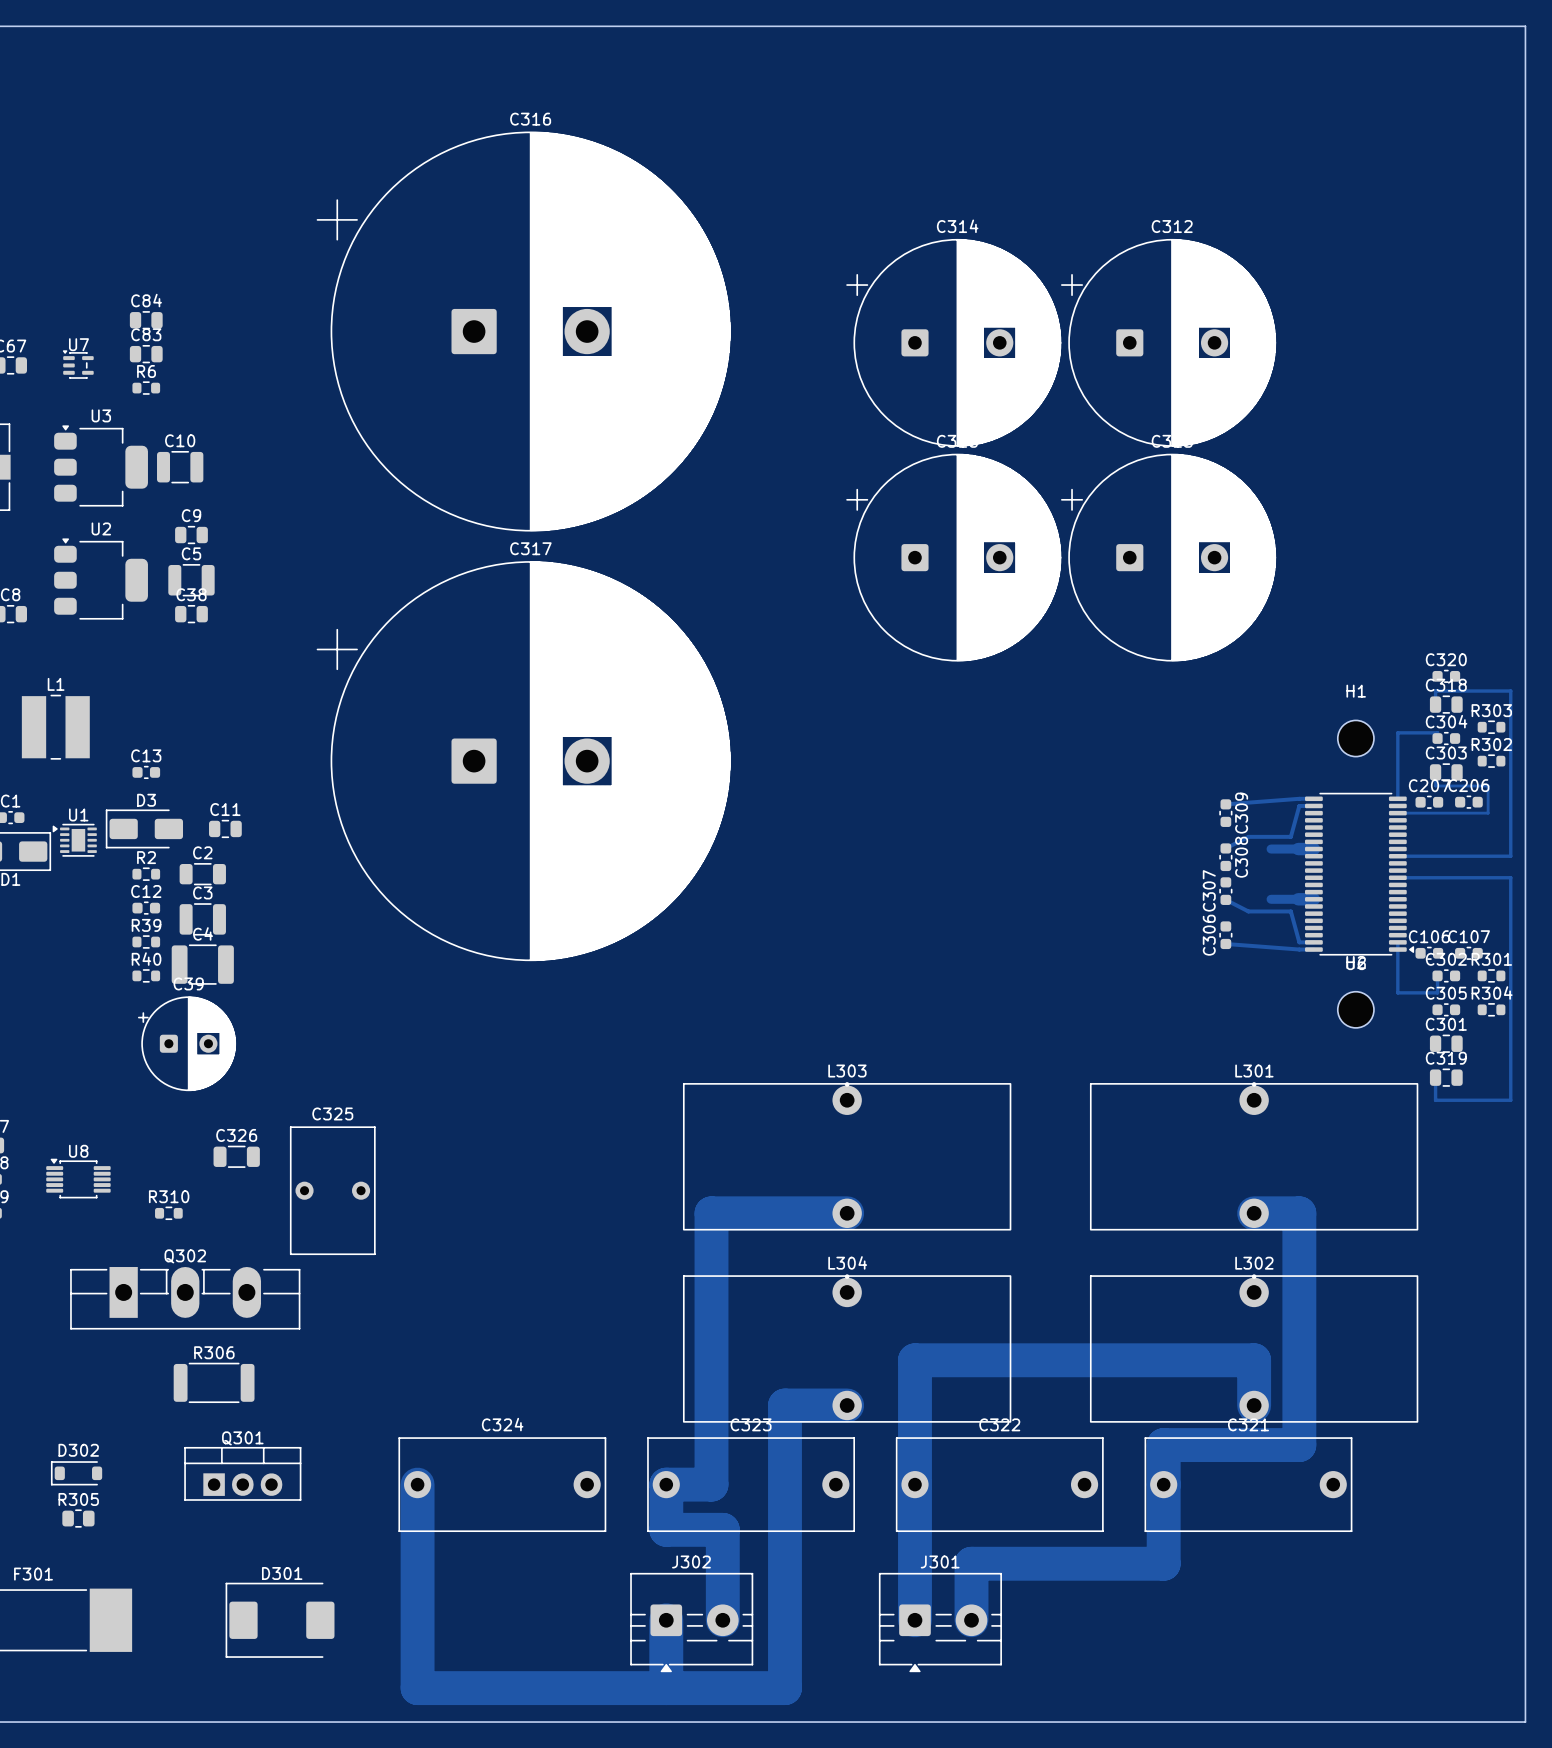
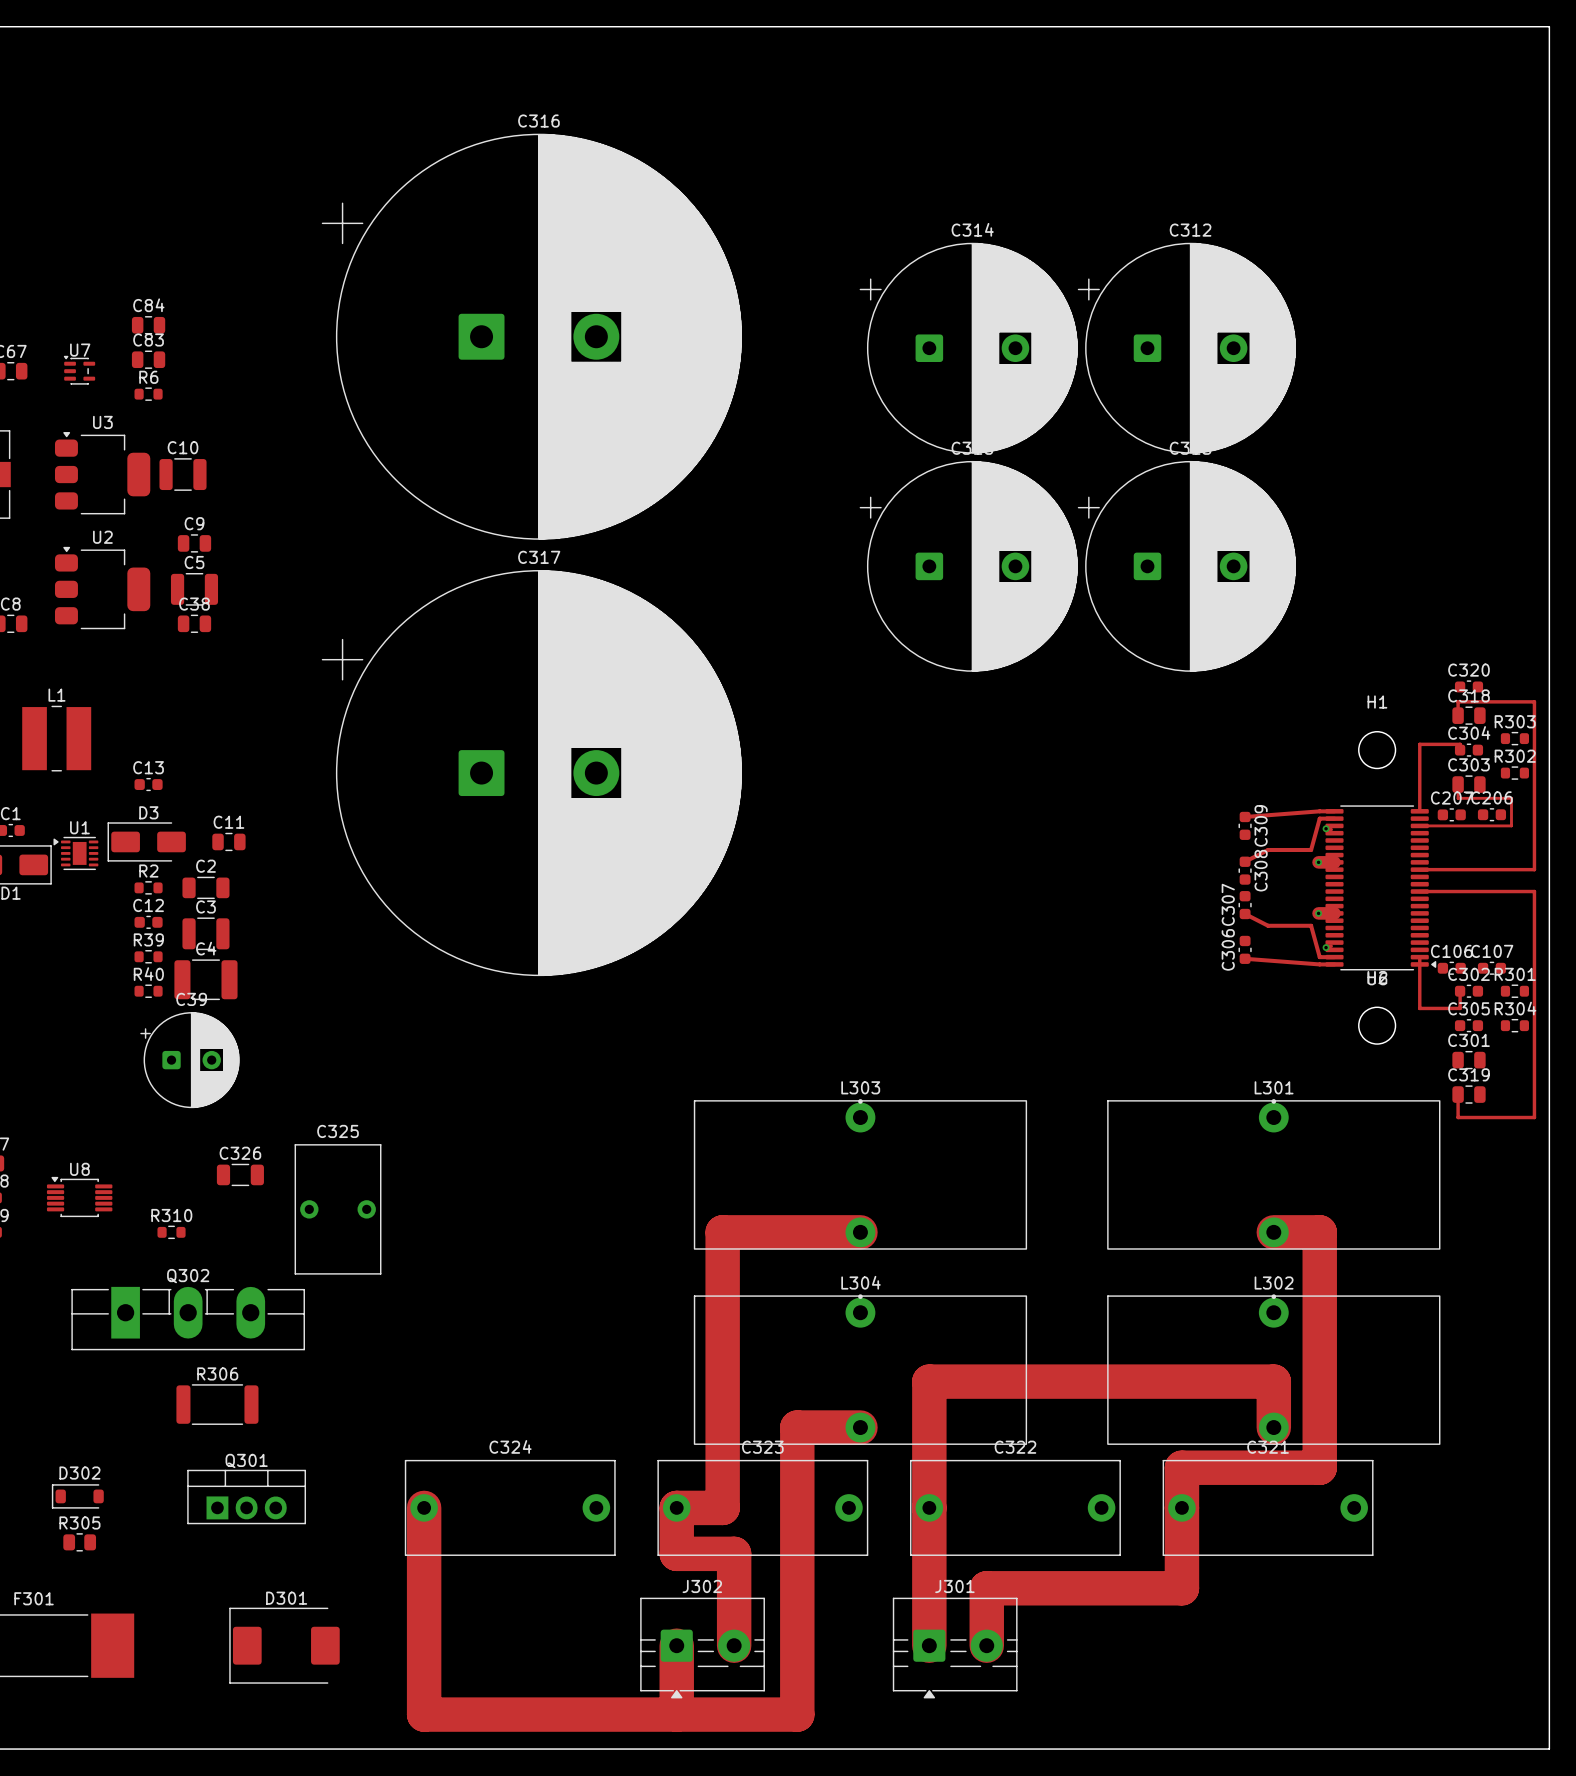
track: none -> (1326, 828) (1331, 829)
via: none -> (1326, 828)
track: (1271, 849) (1298, 849) -> none
via: none -> (1318, 862)
track: (1271, 899) (1298, 899) -> none
via: none -> (1318, 913)
track: none -> (1331, 946) (1326, 947)
via: none -> (1326, 947)

